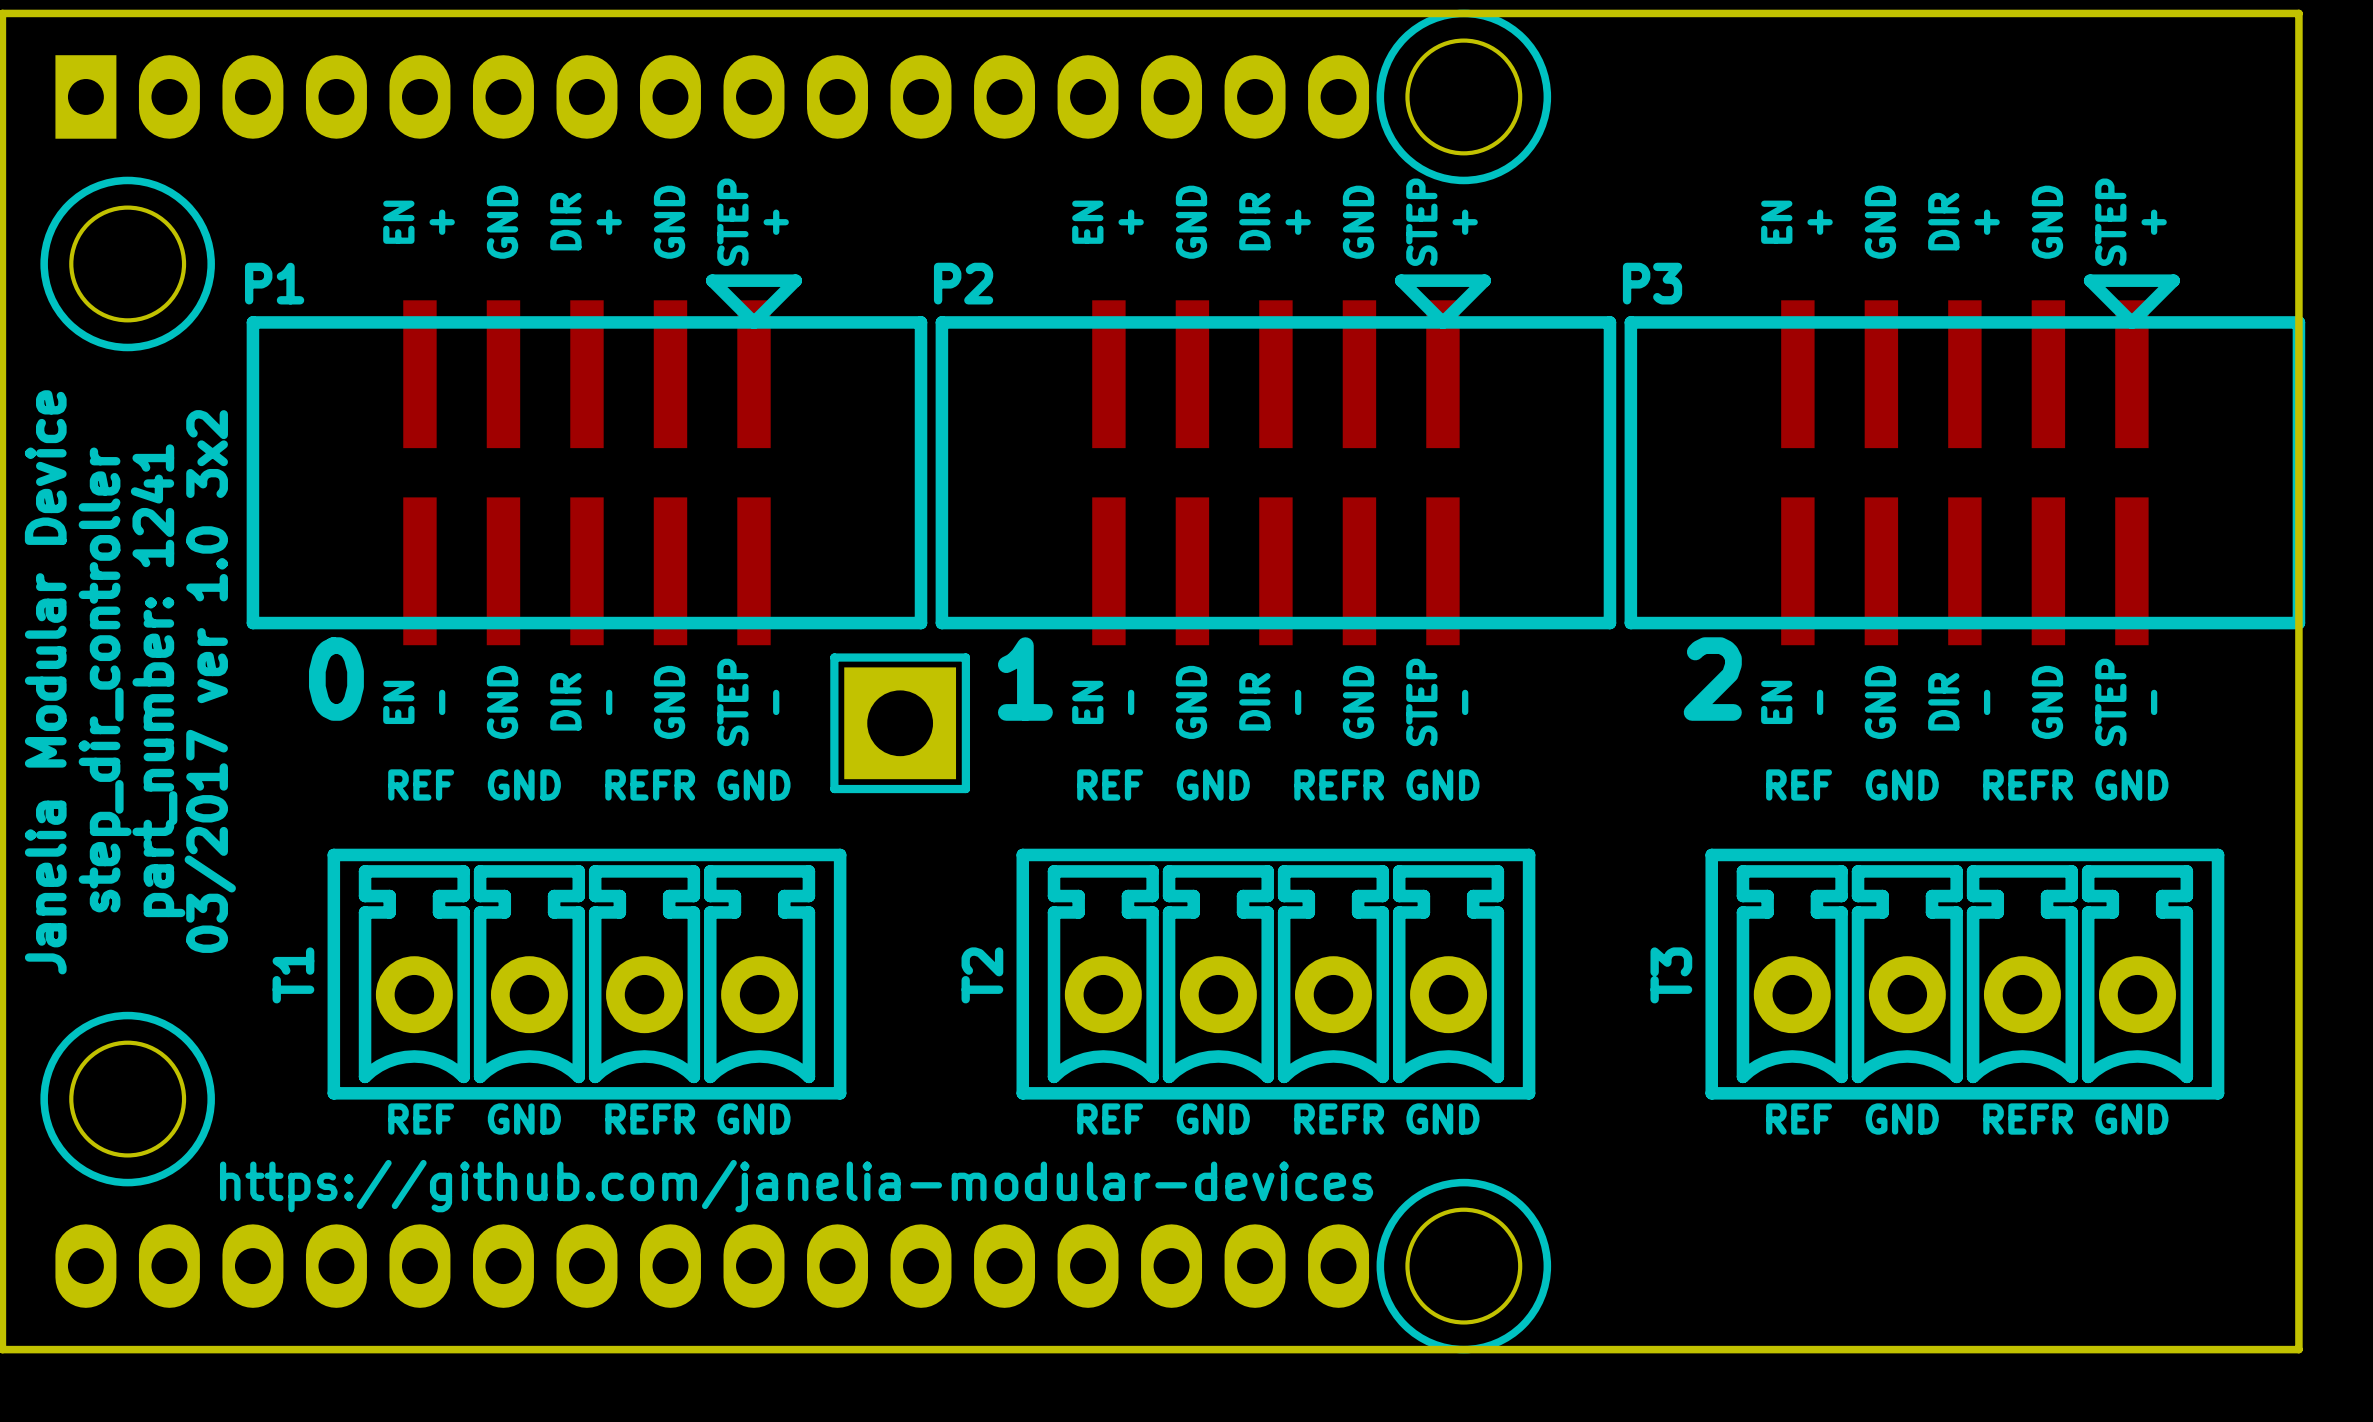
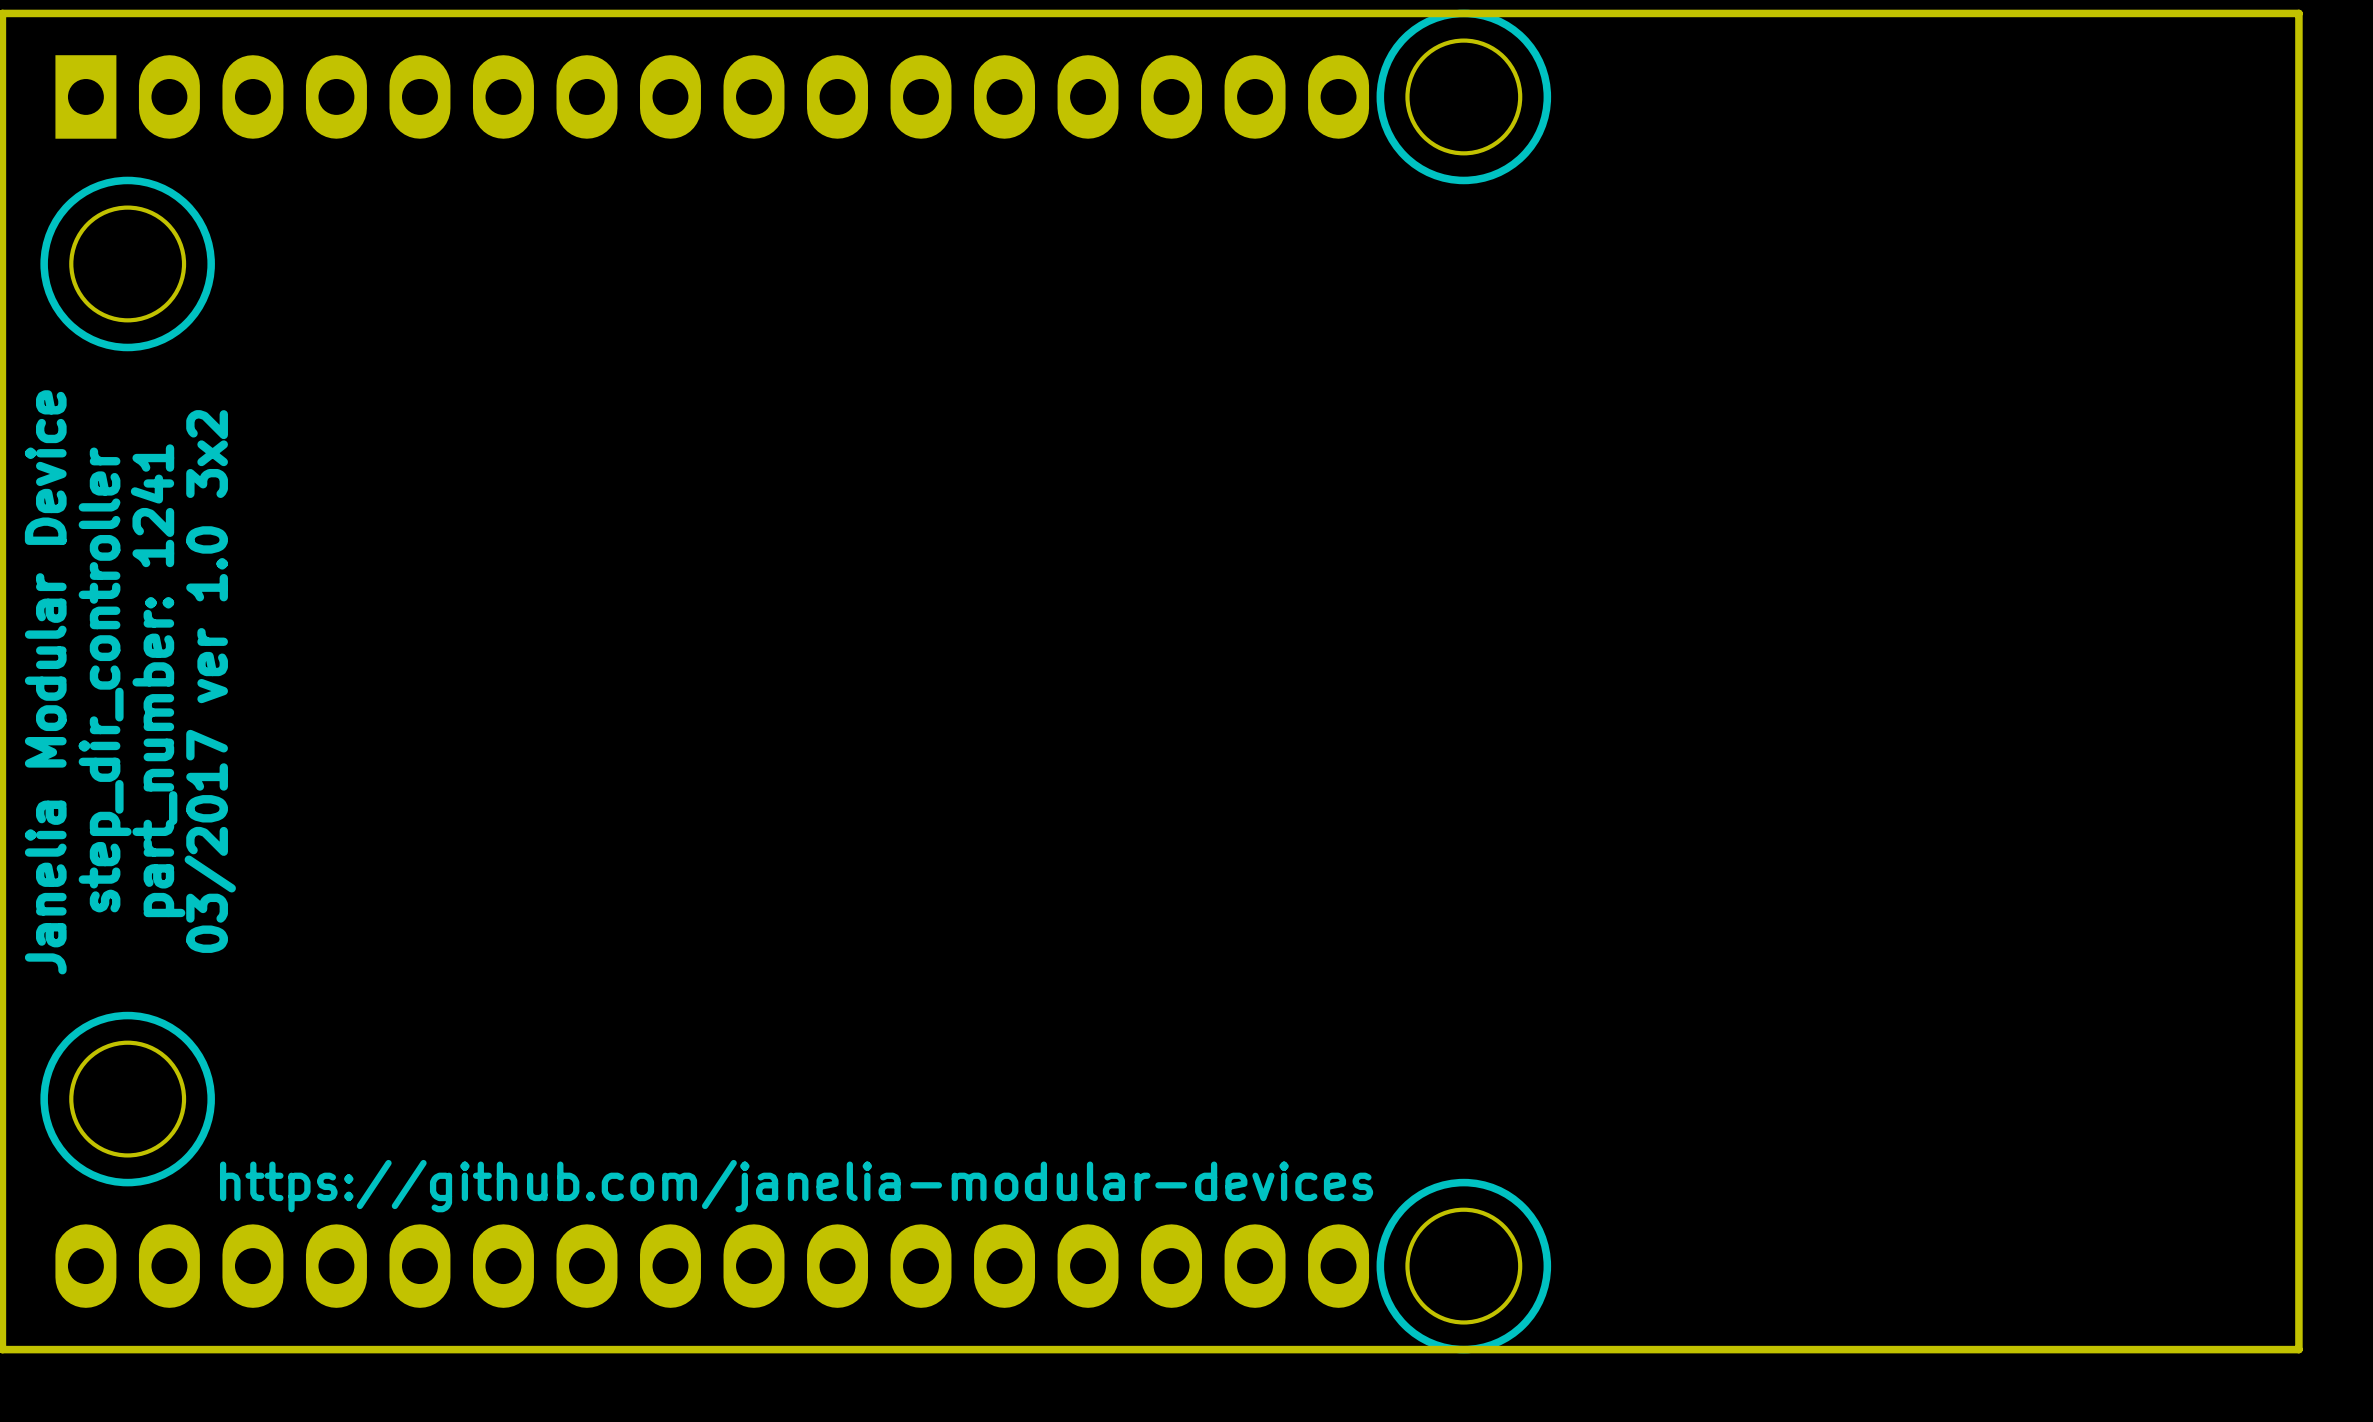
text: DIR (565, 221) -> none
text: DIR (1254, 221) -> none
text: DIR (1943, 221) -> none
text: EN (398, 222) -> none
text: + (442, 222) -> none
text: GND (502, 222) -> none
text: + (609, 222) -> none
text: GND (669, 222) -> none
text: STEP (732, 222) -> none
text: + (776, 222) -> none
text: EN (1087, 222) -> none
text: + (1131, 222) -> none
text: GND (1191, 222) -> none
text: + (1298, 222) -> none
text: GND (1358, 222) -> none
text: STEP (1421, 222) -> none
text: + (1465, 222) -> none
text: EN (1776, 222) -> none
text: + (1820, 222) -> none
text: GND (1880, 222) -> none
text: + (1987, 222) -> none
text: GND (2047, 222) -> none
text: STEP (2110, 222) -> none
text: + (2154, 222) -> none
P1: (586, 459) -> none
P2: (1275, 459) -> none
P3: (1964, 459) -> none
text: 0 (336, 679) -> none
text: 1 (1025, 679) -> none
text: 2 (1712, 679) -> none
text: DIR (565, 701) -> none
text: DIR (1254, 701) -> none
text: DIR (1943, 701) -> none
text: EN (398, 702) -> none
text: - (442, 702) -> none
text: GND (502, 702) -> none
text: - (609, 702) -> none
text: GND (669, 702) -> none
text: STEP (732, 702) -> none
text: - (776, 702) -> none
text: EN (1087, 702) -> none
text: - (1131, 702) -> none
text: GND (1191, 702) -> none
text: - (1298, 702) -> none
text: GND (1358, 702) -> none
text: STEP (1421, 702) -> none
text: - (1465, 702) -> none
text: EN (1776, 702) -> none
text: - (1820, 702) -> none
text: GND (1880, 702) -> none
text: - (1987, 702) -> none
text: GND (2047, 702) -> none
text: STEP (2110, 702) -> none
text: - (2154, 702) -> none
part: (900, 723) -> none
text: REF (421, 784) -> none
text: GND (524, 784) -> none
text: REFR (650, 784) -> none
text: GND (753, 784) -> none
text: REF (1110, 784) -> none
text: GND (1213, 784) -> none
text: REFR (1339, 784) -> none
text: GND (1442, 784) -> none
text: REF (1799, 784) -> none
text: GND (1902, 784) -> none
text: REFR (2028, 784) -> none
text: GND (2131, 784) -> none
T1: (586, 974) -> none
T2: (1275, 974) -> none
T3: (1964, 974) -> none
text: REF (421, 1119) -> none
text: GND (524, 1119) -> none
text: REFR (650, 1119) -> none
text: GND (753, 1119) -> none
text: REF (1110, 1119) -> none
text: GND (1213, 1119) -> none
text: REFR (1339, 1119) -> none
text: GND (1442, 1119) -> none
text: REF (1799, 1119) -> none
text: GND (1902, 1119) -> none
text: REFR (2028, 1119) -> none
text: GND (2131, 1119) -> none

